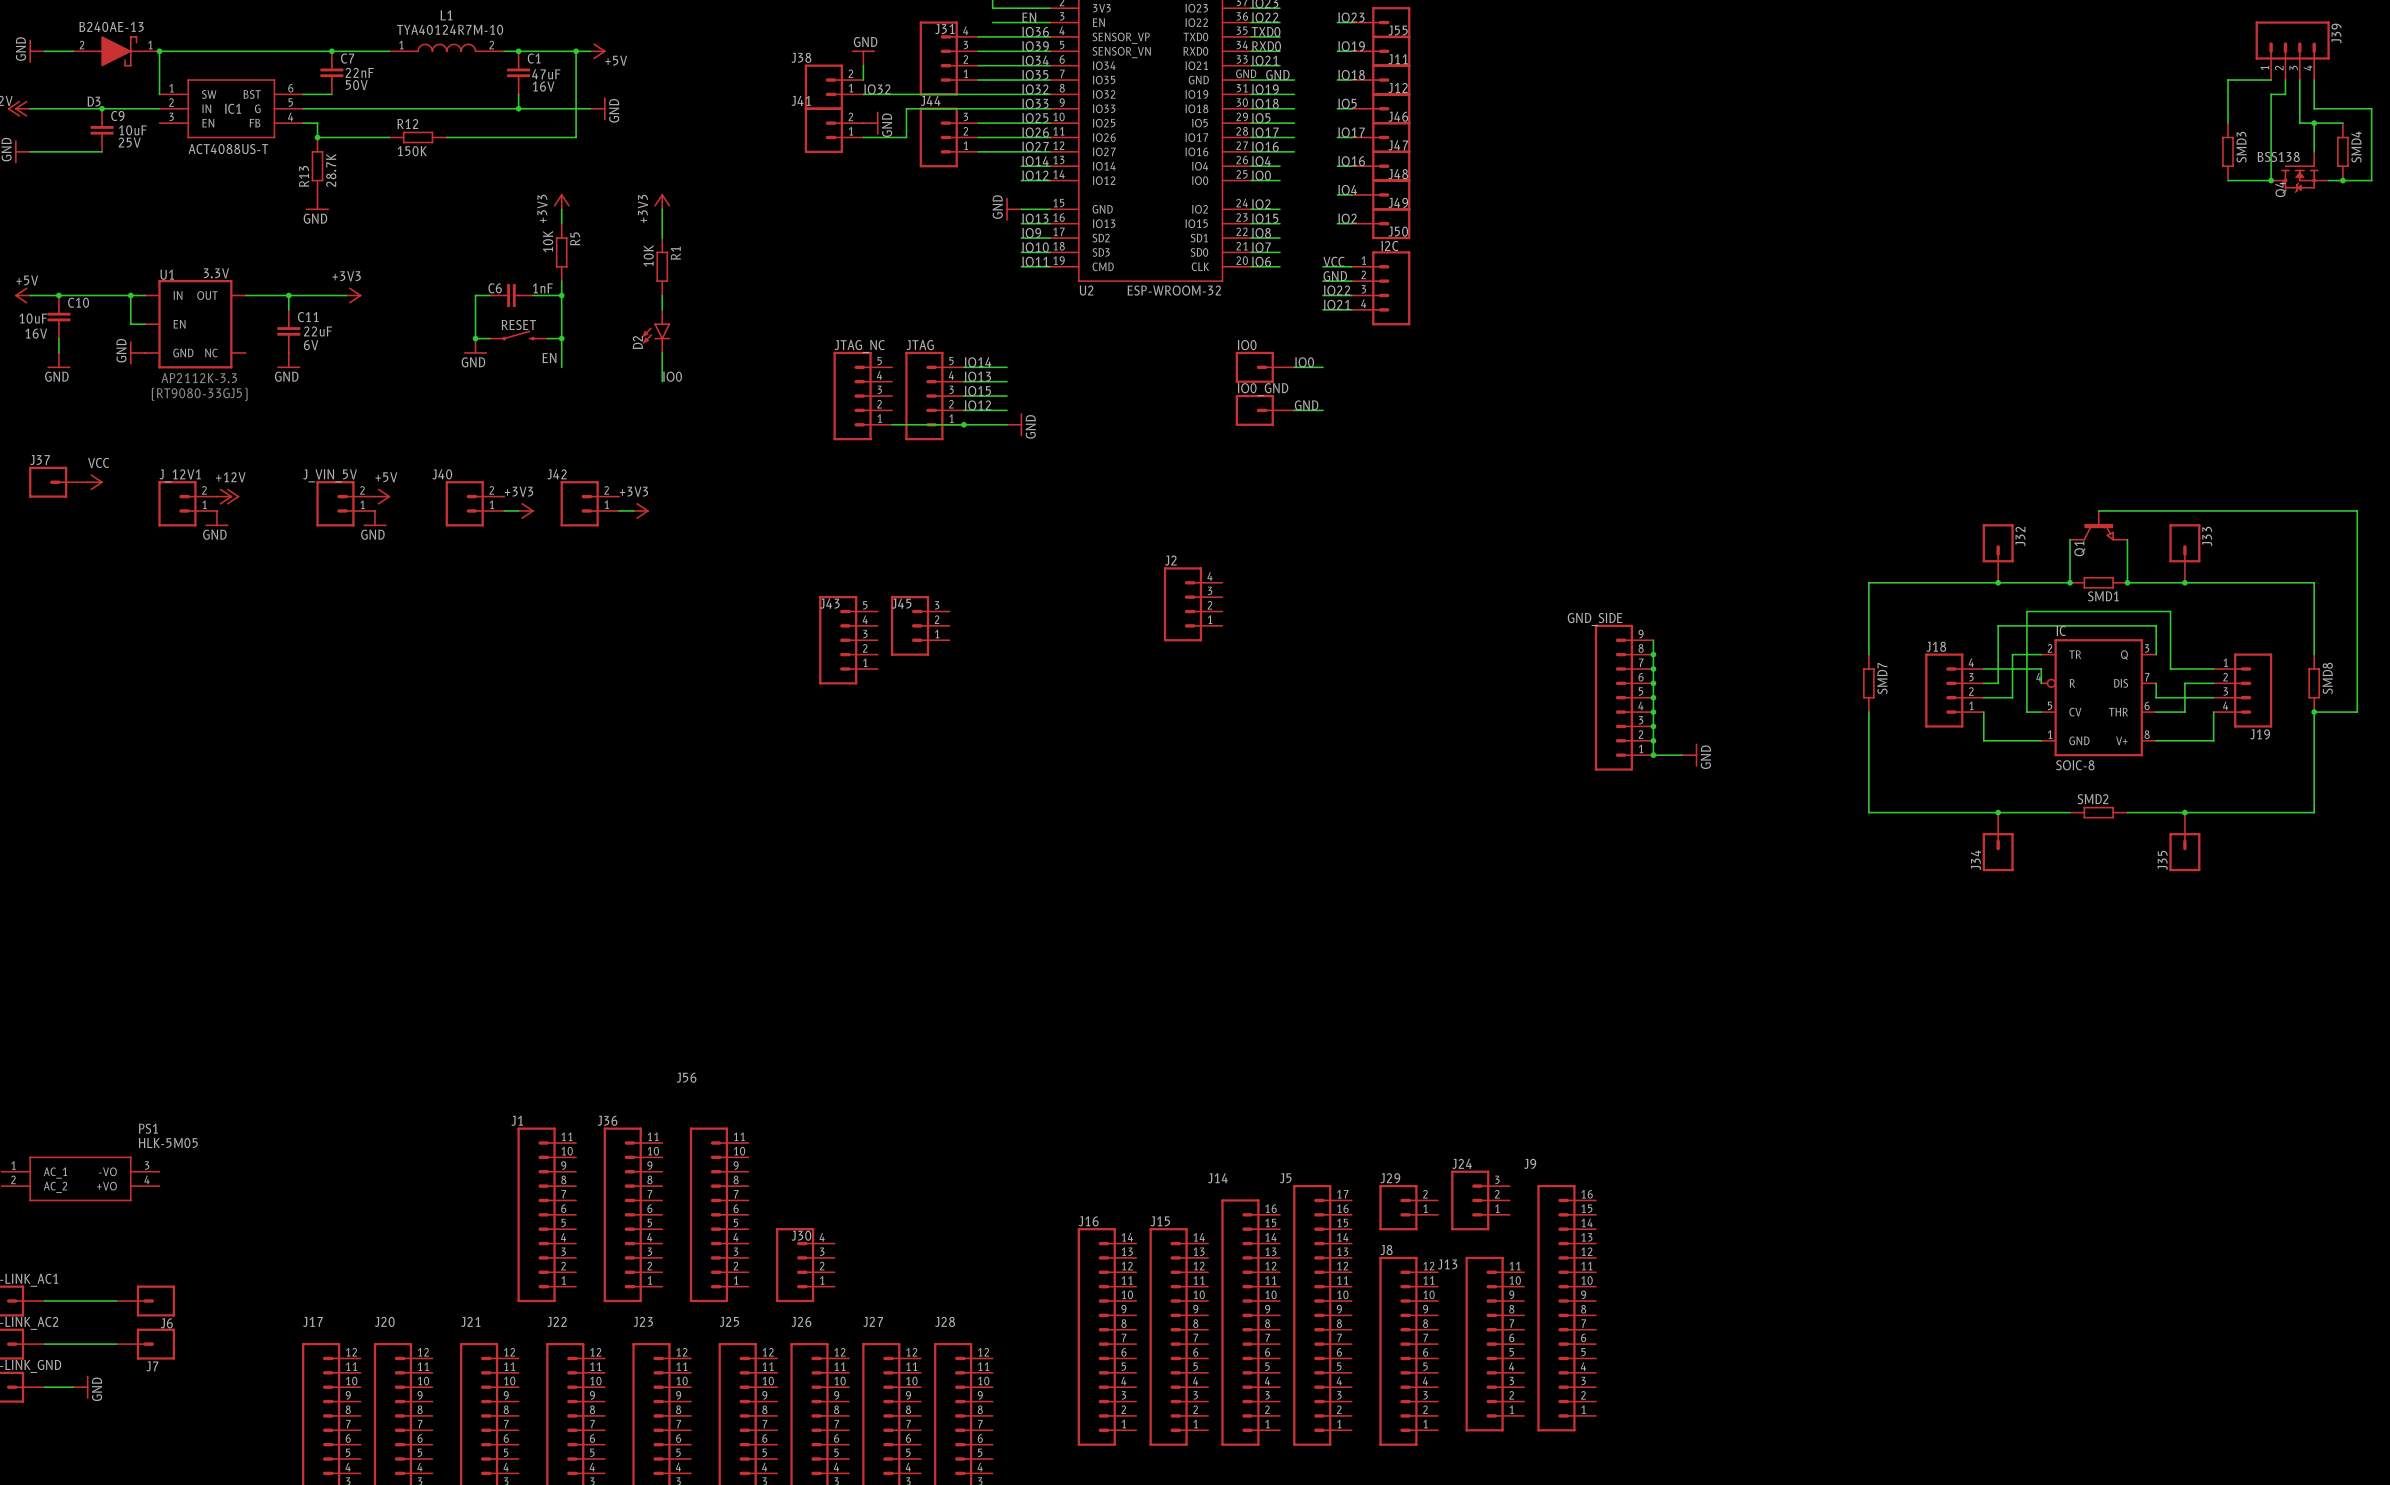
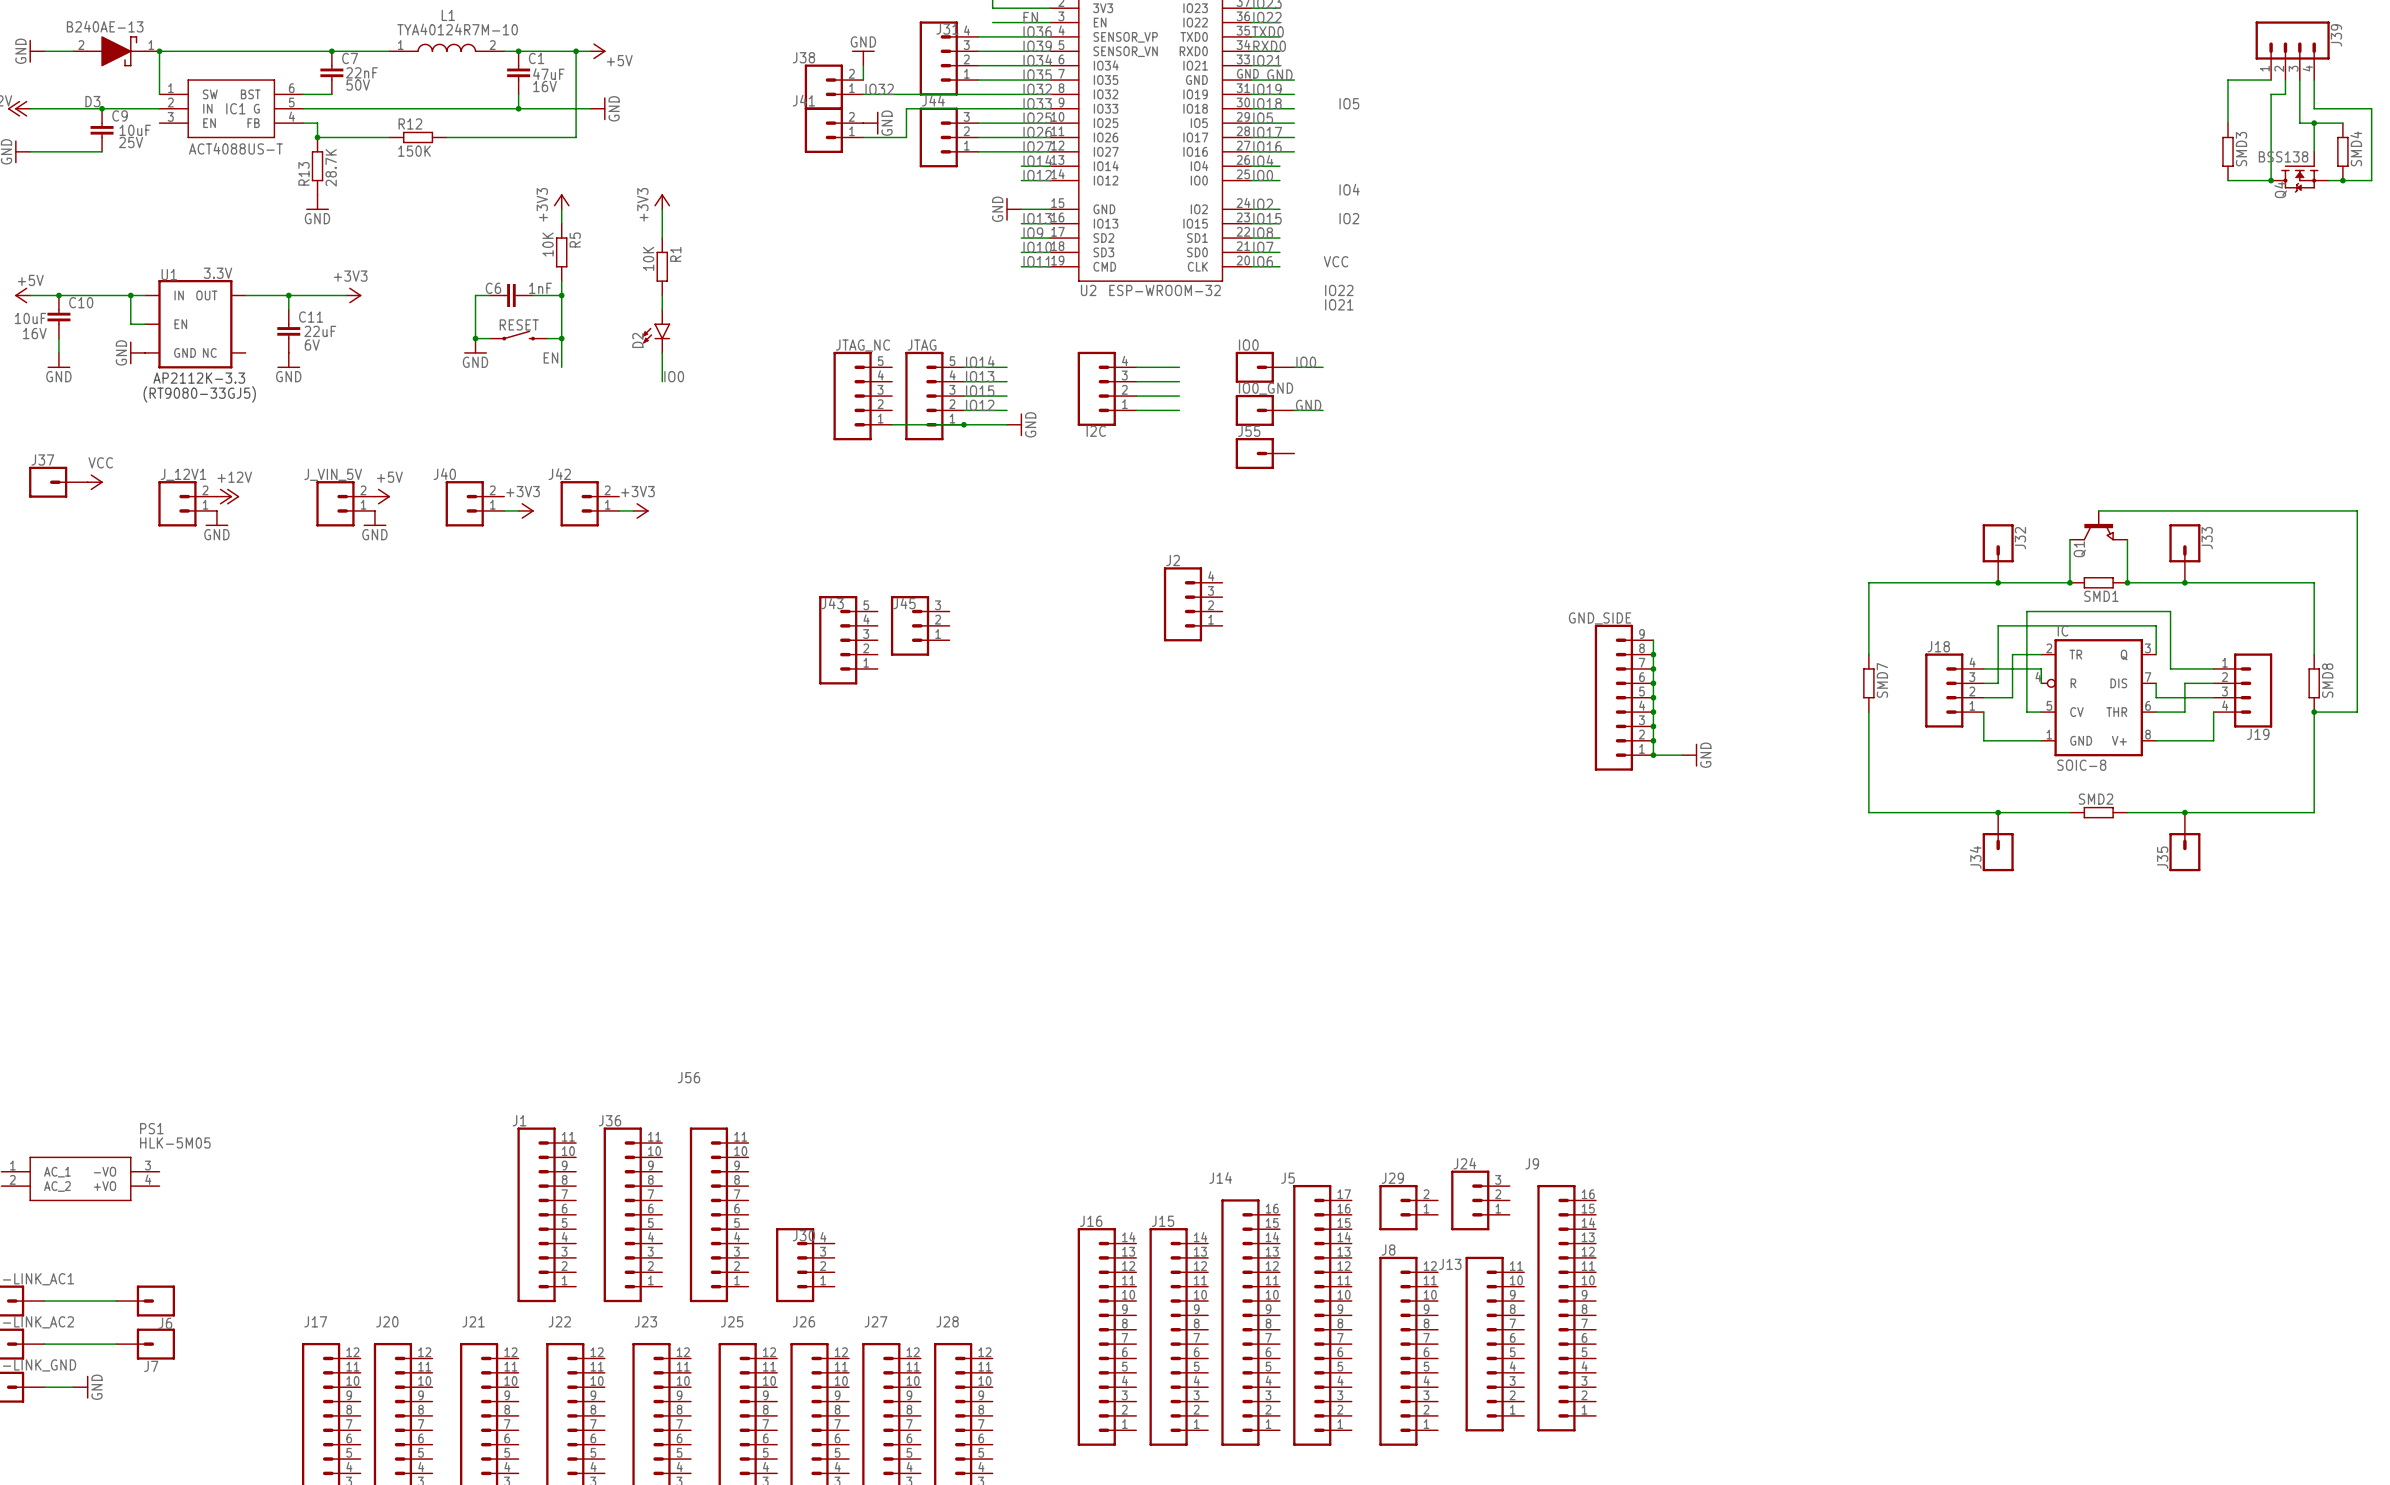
label: IO23 (1351, 17) -> none
wire: (1337, 22) (1351, 22) -> none
J55 position: (1381, 22) -> (1265, 453)
J55 rotation: 0° (1391, 22) -> 180° (1254, 453)
J55 name position: J55 (1398, 30) -> J55 (1249, 431)
label: IO19 (1351, 46) -> none
wire: (1337, 51) (1351, 51) -> none
J11: (1381, 51) -> none
label: IO18 (1351, 75) -> none
wire: (1337, 80) (1351, 80) -> none
J12: (1381, 80) -> none
wire: (1337, 108) (1351, 108) -> none
J46: (1381, 108) -> none
label: IO17 (1351, 132) -> none
wire: (1337, 137) (1351, 137) -> none
J47: (1381, 137) -> none
label: IO16 (1351, 161) -> none
wire: (1337, 166) (1351, 166) -> none
J48: (1381, 166) -> none
wire: (1337, 194) (1351, 194) -> none
J49: (1381, 194) -> none
wire: (1337, 223) (1351, 223) -> none
J50: (1381, 223) -> none
wire: (1323, 266) (1351, 266) -> none
label: GND (1335, 276) -> none
wire: (1323, 281) (1351, 281) -> none
I2C position: (1381, 288) -> (1106, 388)
I2C rotation: 0° (1391, 288) -> 180° (1096, 388)
wire: (1323, 295) (1351, 295) -> none
wire: (1323, 309) (1351, 309) -> none
wire: none -> (1136, 367) (1179, 367)
wire: none -> (1136, 381) (1179, 381)
wire: none -> (1136, 396) (1179, 396)
wire: none -> (1136, 410) (1179, 410)

